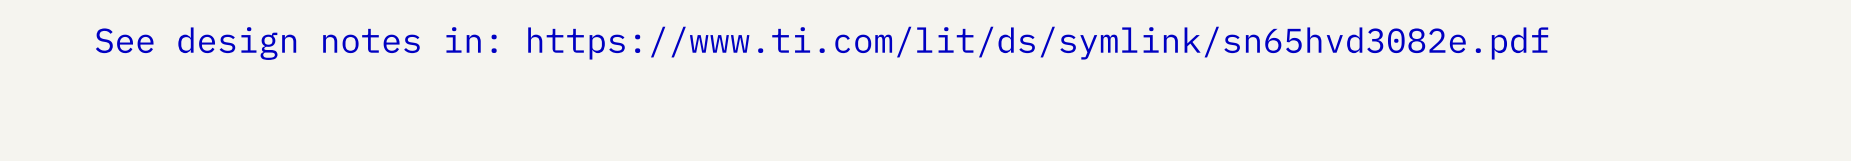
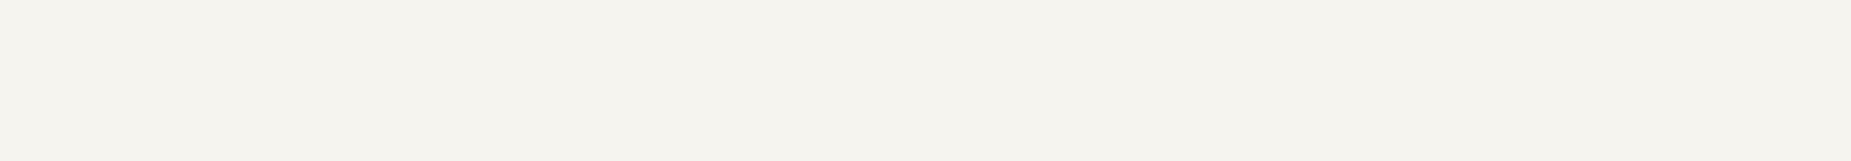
text: See design notes in: https://www.ti.com/lit/ds/symlink/sn65hvd3082e.pdf (822, 43) -> none

